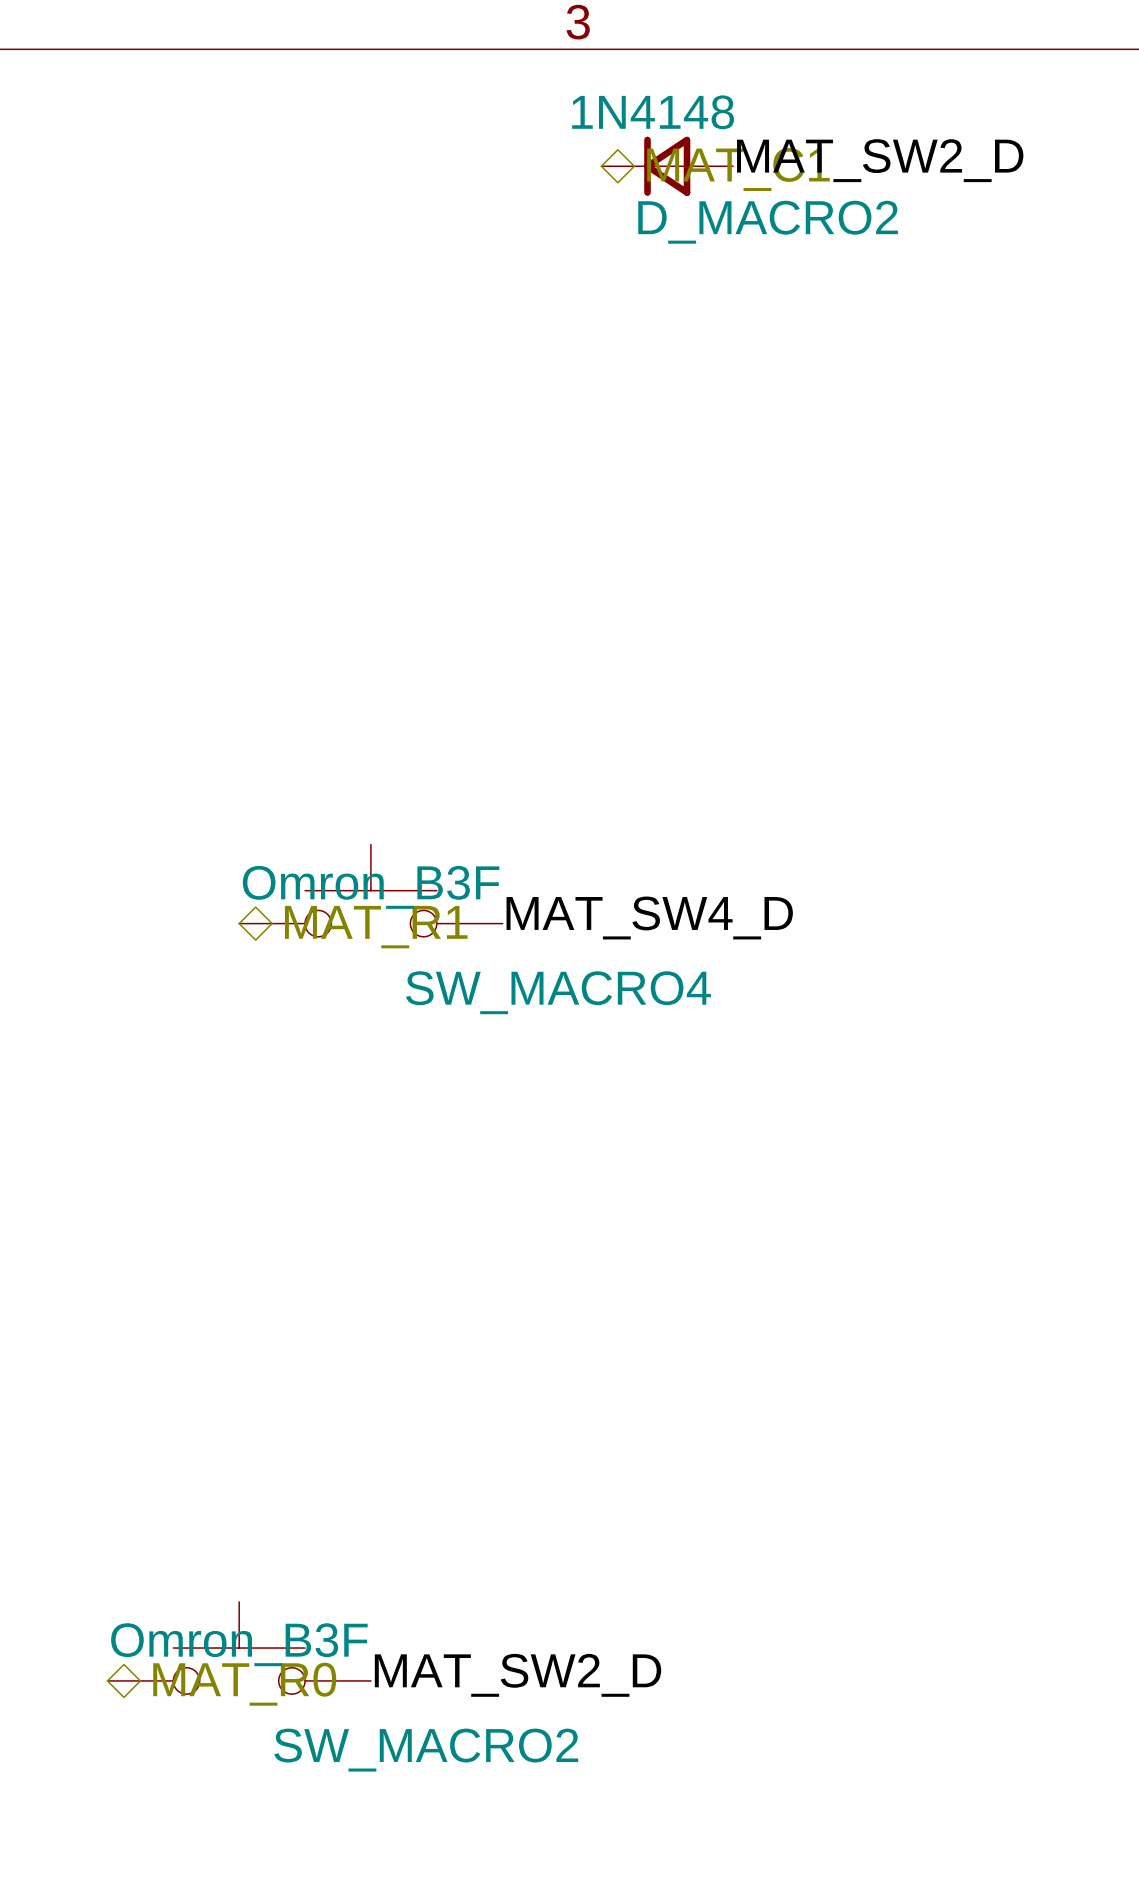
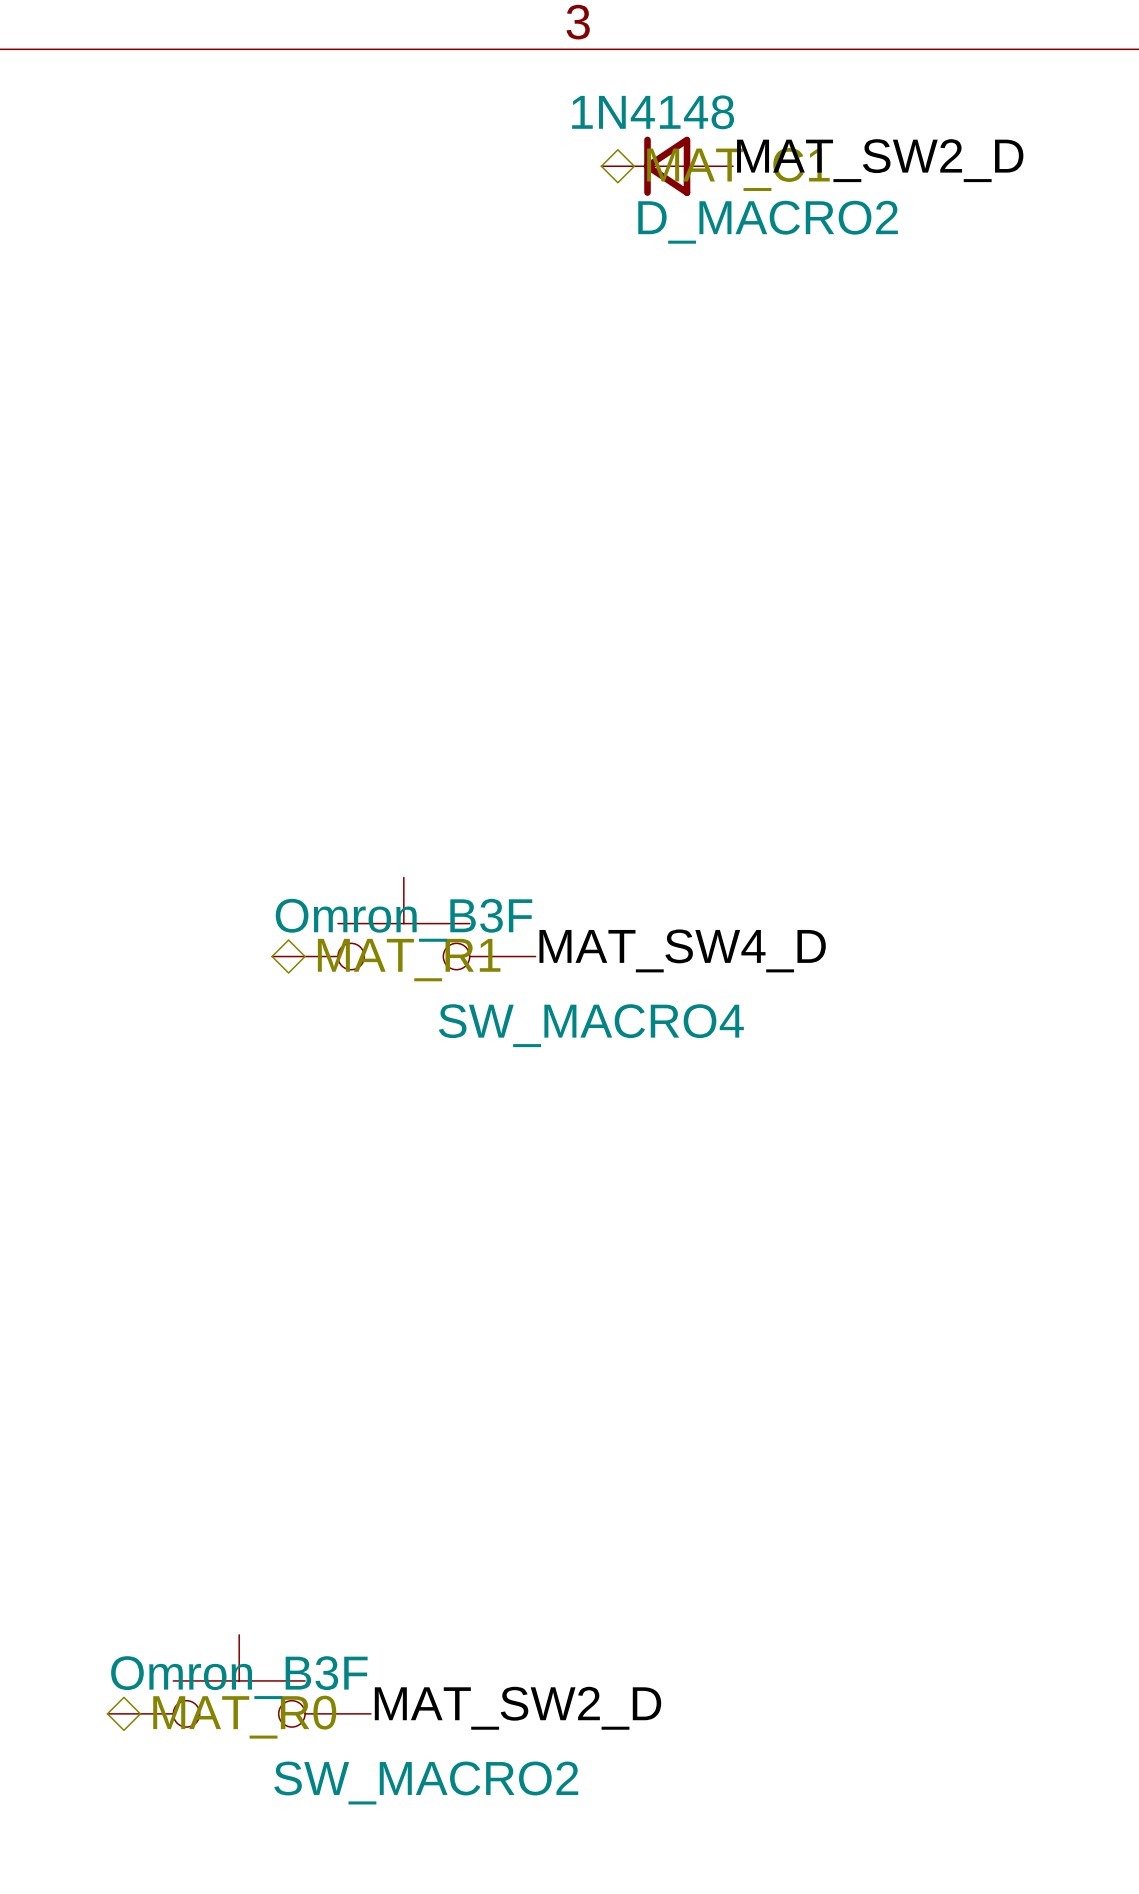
SW_MACRO4 position: (370, 890) -> (403, 923)
label position: MAT_SW4_D (649, 917) -> MAT_SW4_D (682, 950)
hierarchical label position: MAT_R1 (376, 927) -> MAT_R1 (409, 960)
SW_MACRO2 position: (239, 1648) -> (239, 1680)
label position: MAT_SW2_D (518, 1675) -> MAT_SW2_D (518, 1708)
hierarchical label position: MAT_R0 (244, 1684) -> MAT_R0 (244, 1717)

